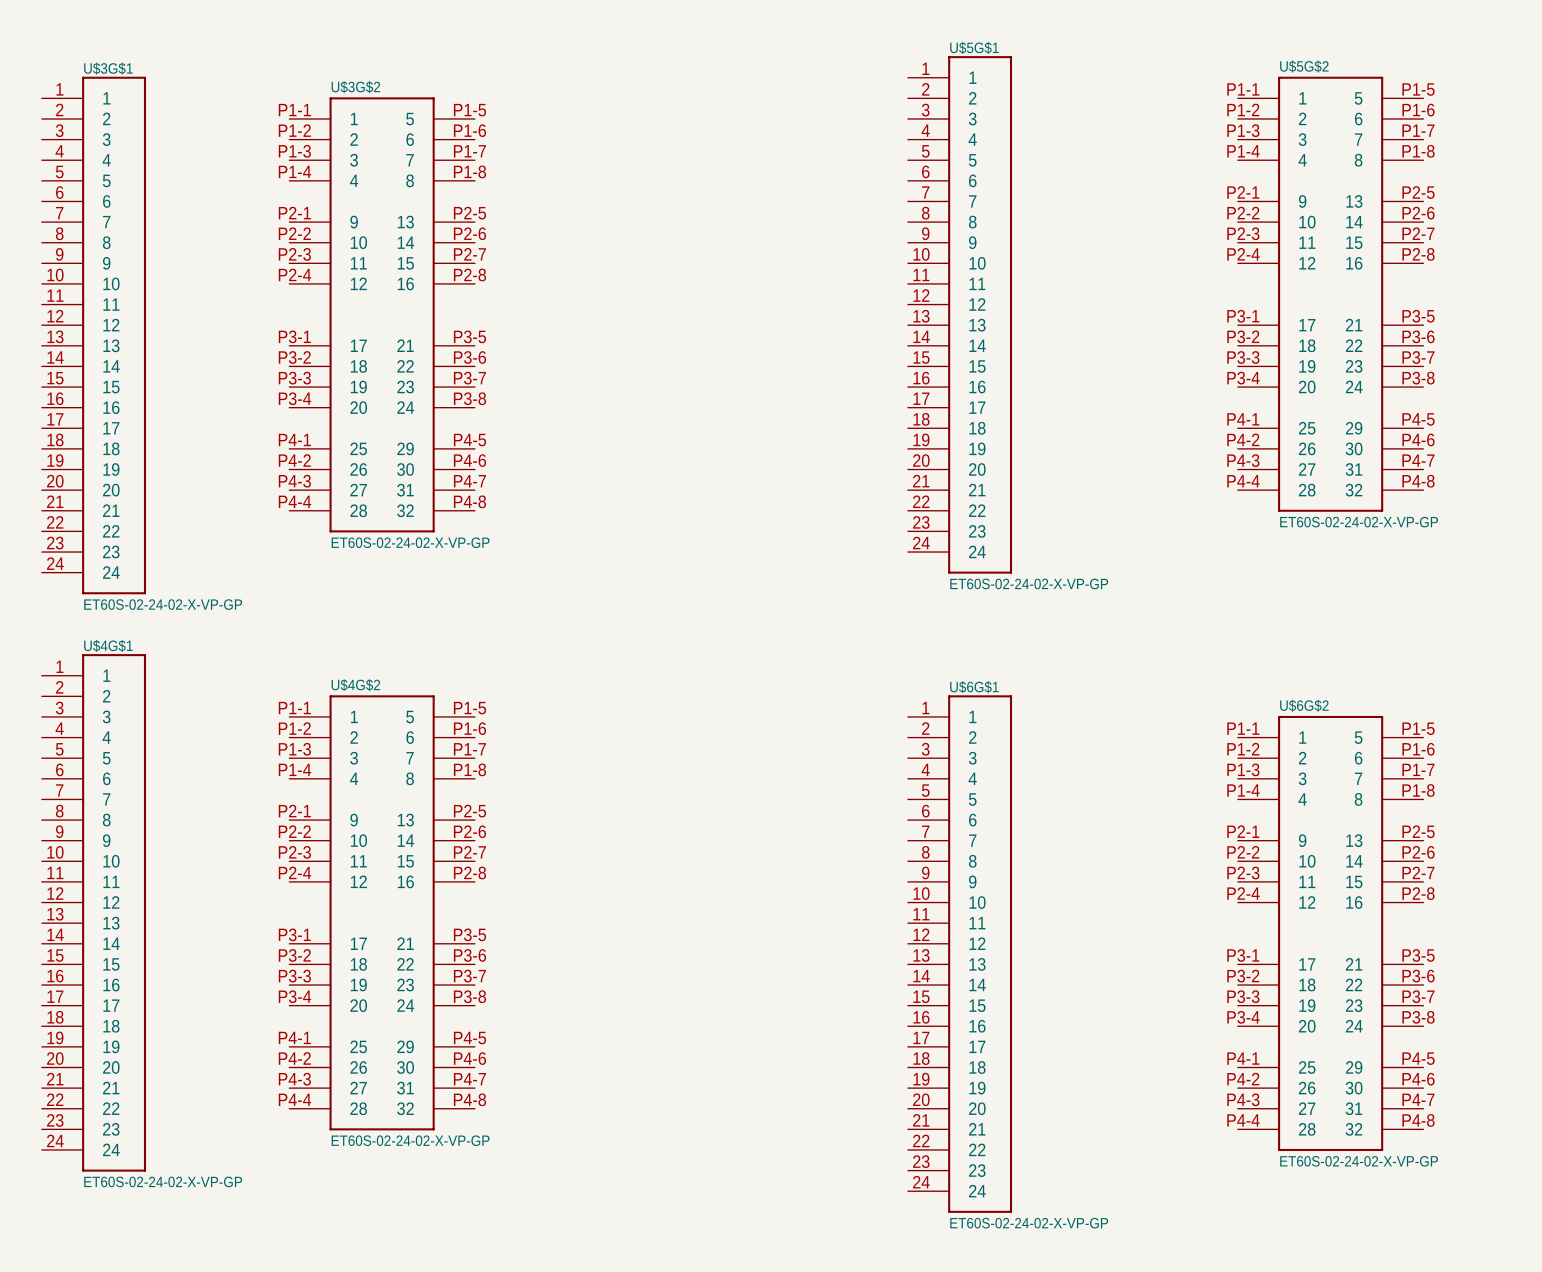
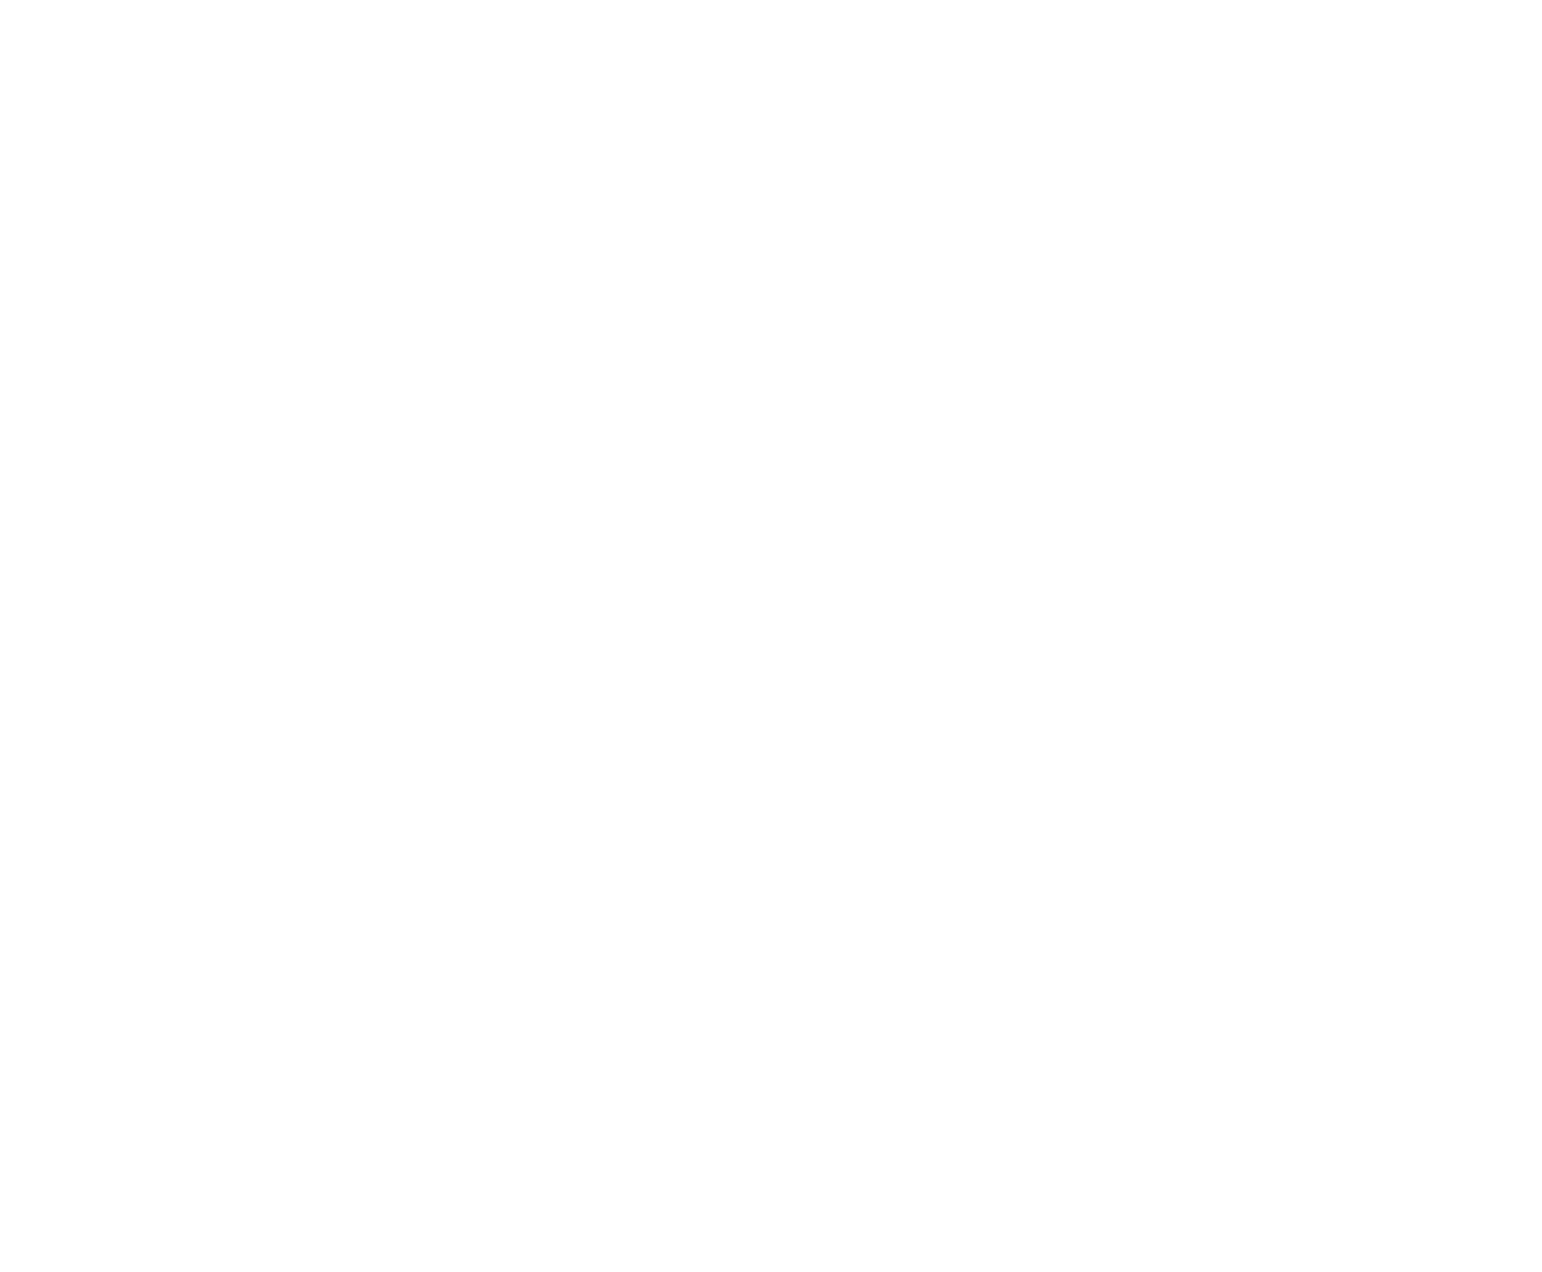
U$5G$2: ET60S-02-24-02-X-VP-GP (1330, 294) -> none
U$3G$2: ET60S-02-24-02-X-VP-GP (382, 314) -> none
U$5G$1: ET60S-02-24-02-X-VP-GP (959, 314) -> none
U$3G$1: ET60S-02-24-02-X-VP-GP (93, 335) -> none
U$4G$1: ET60S-02-24-02-X-VP-GP (93, 912) -> none
U$4G$2: ET60S-02-24-02-X-VP-GP (382, 912) -> none
U$6G$2: ET60S-02-24-02-X-VP-GP (1330, 933) -> none
U$6G$1: ET60S-02-24-02-X-VP-GP (959, 954) -> none

